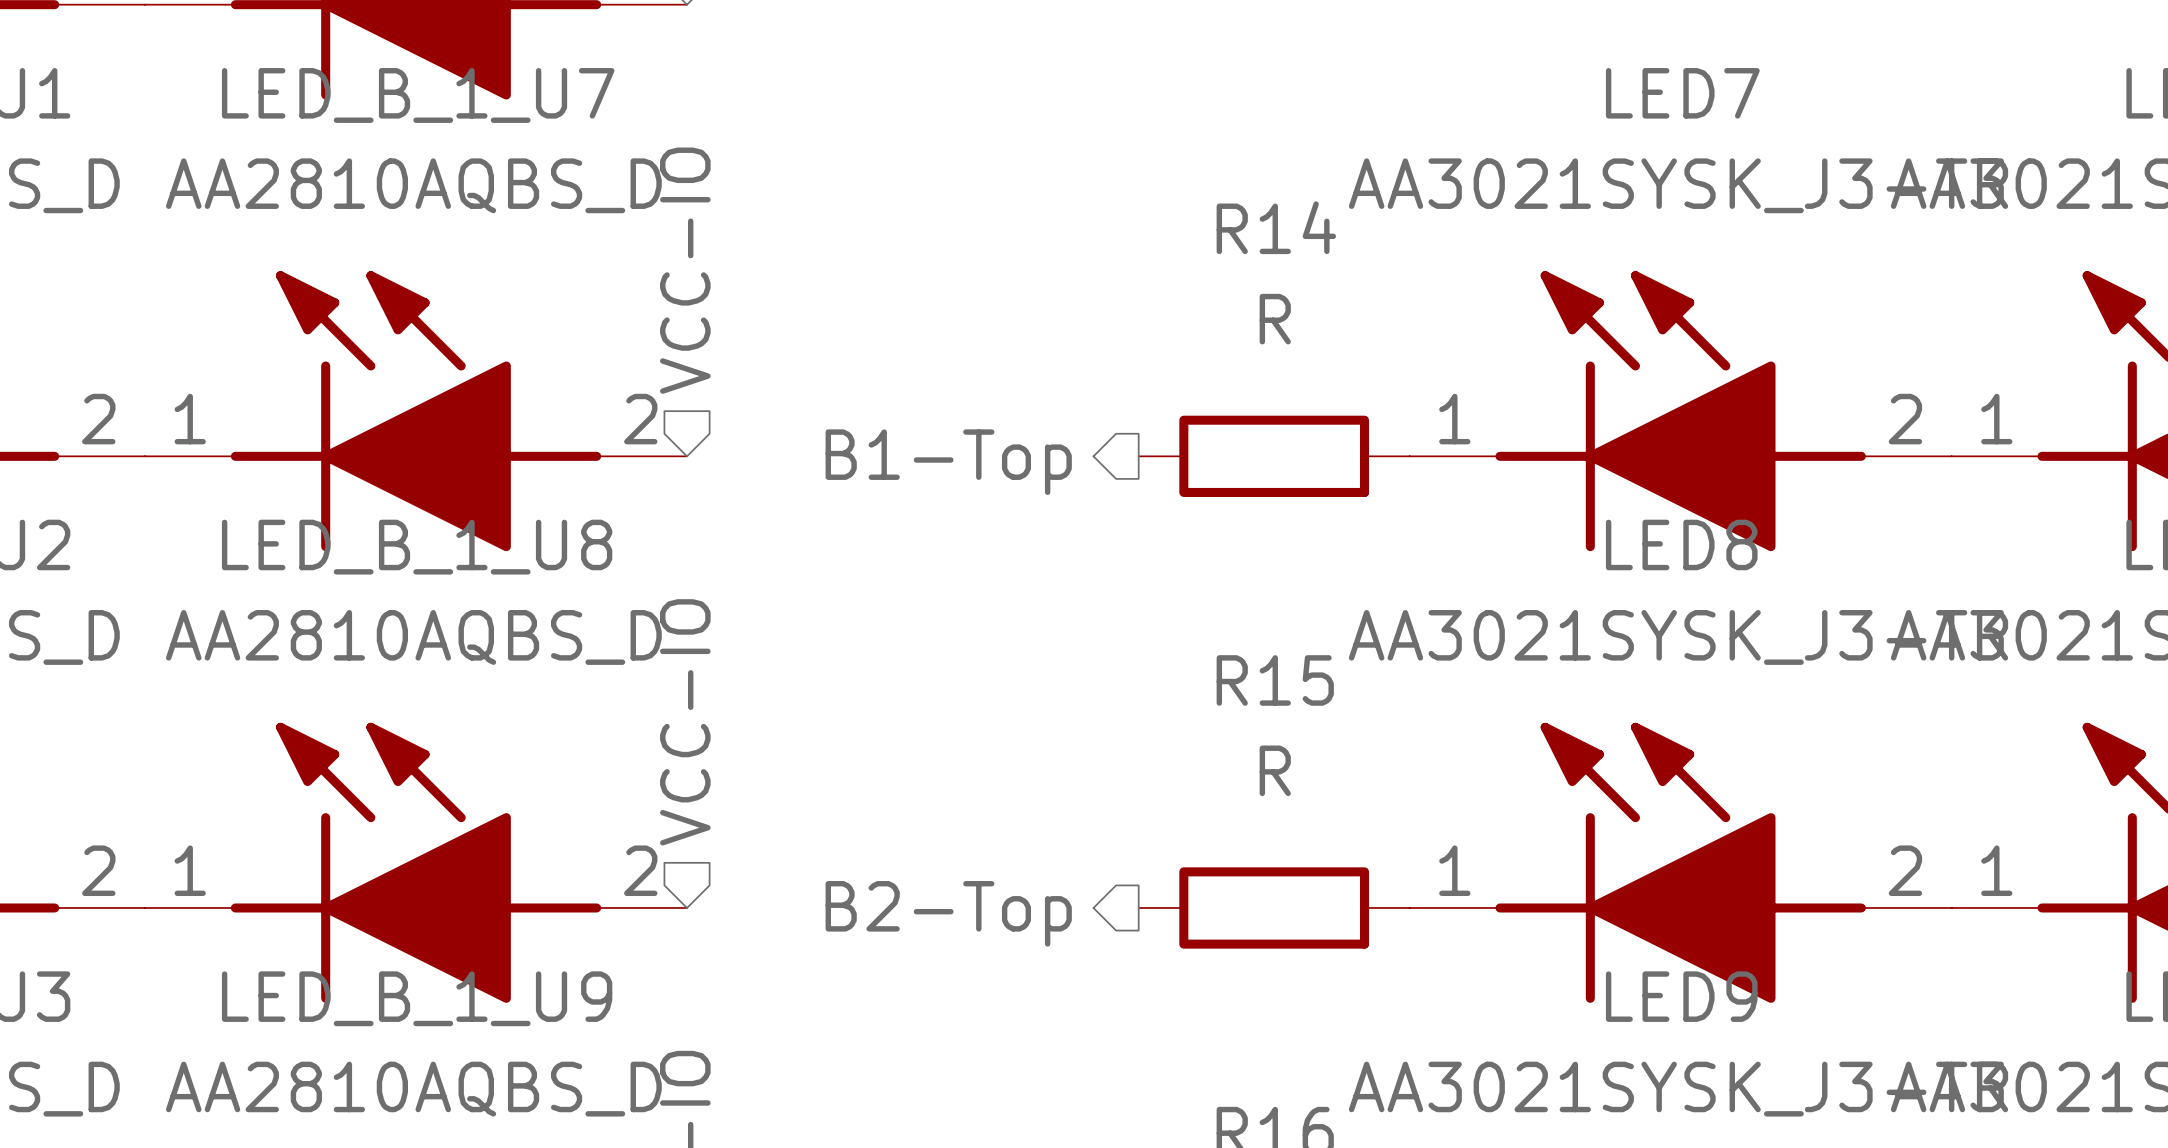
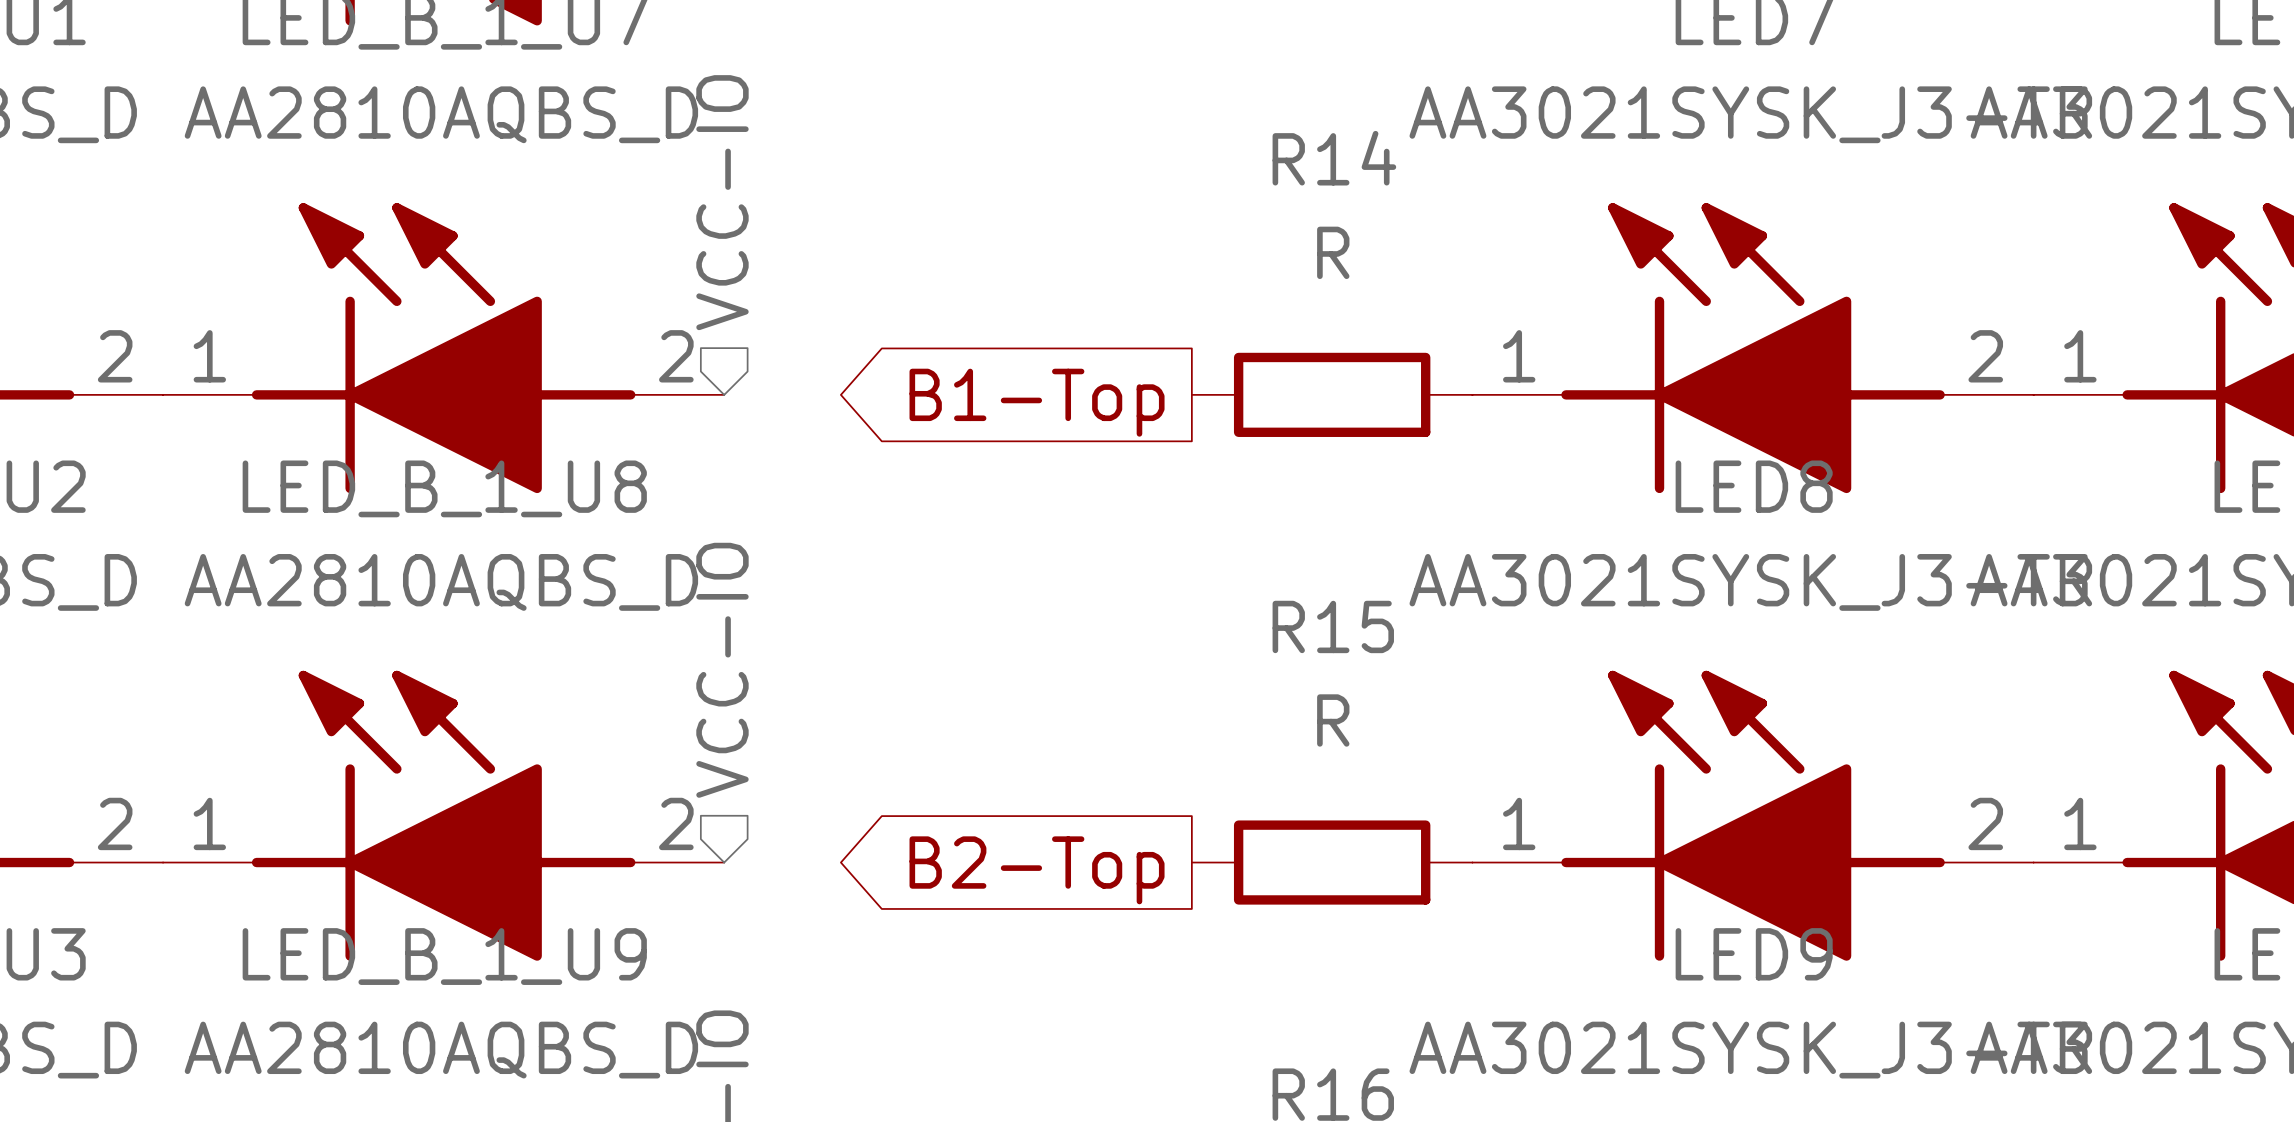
hierarchical label: B1-Top (948, 462) -> none
global label: none -> B1-Top (1037, 402)
hierarchical label: B2-Top (948, 913) -> none
global label: none -> B2-Top (1037, 870)

